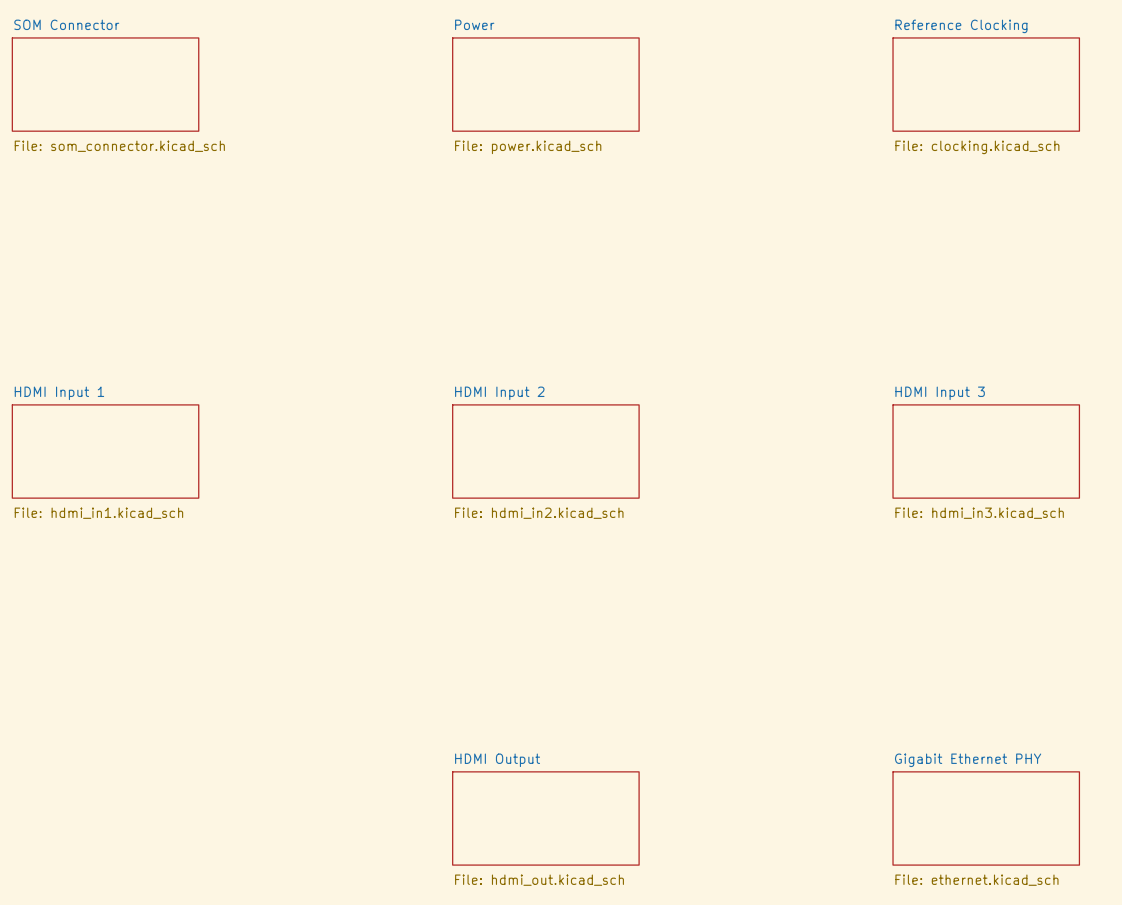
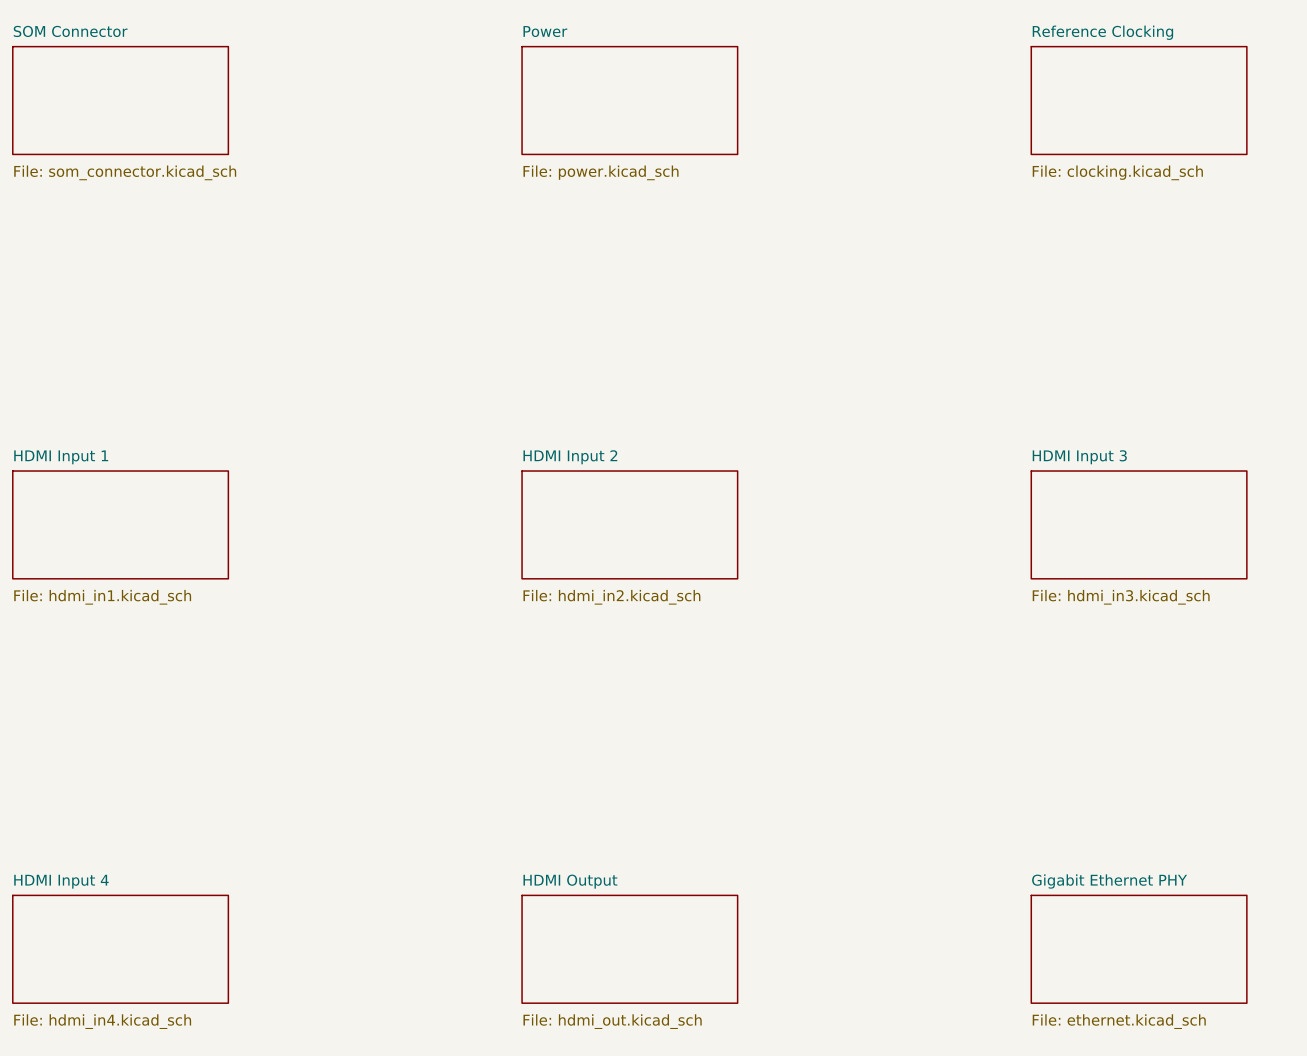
sheet HDMI Input 4: none -> File: hdmi_in4.kicad_sch (120, 949)

